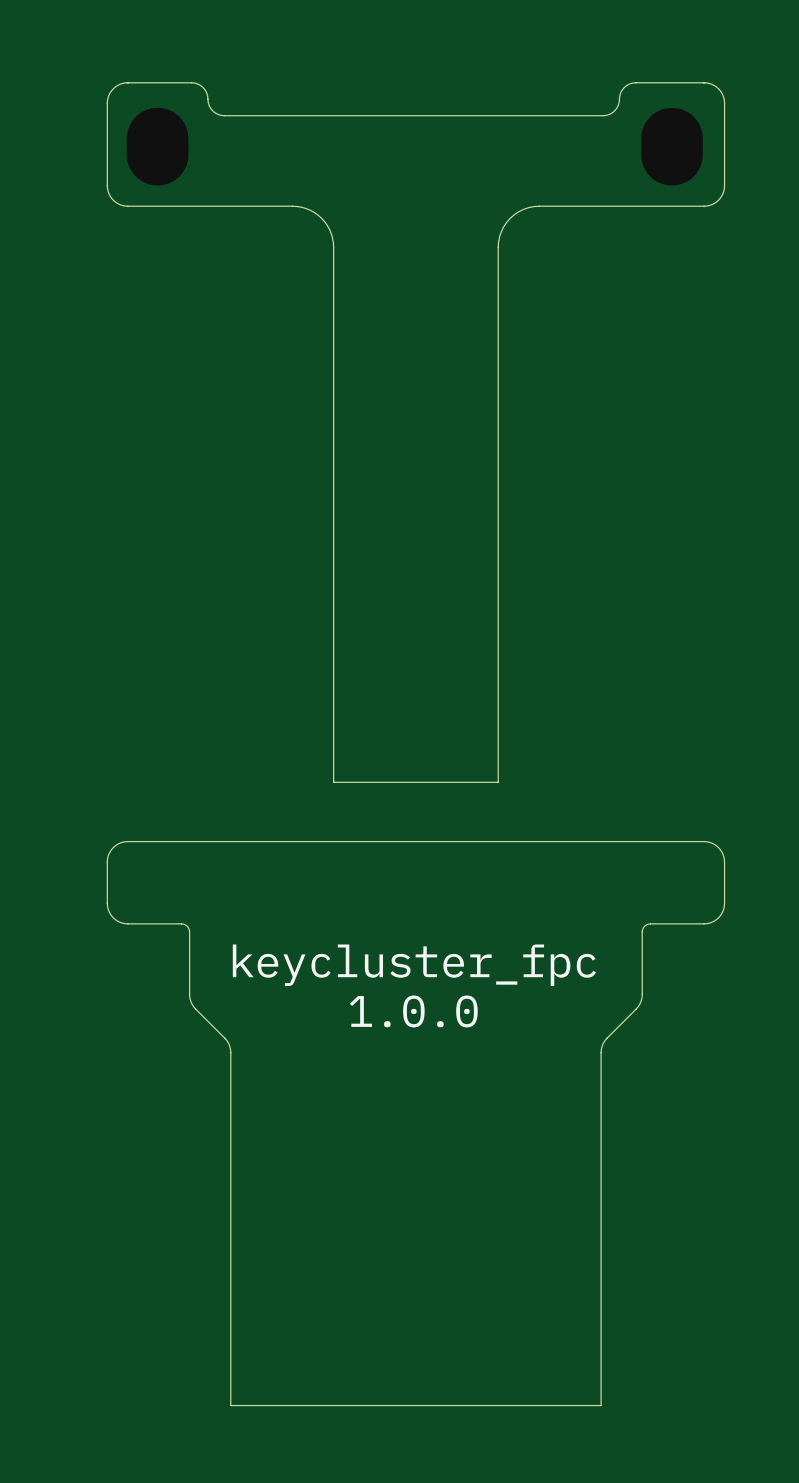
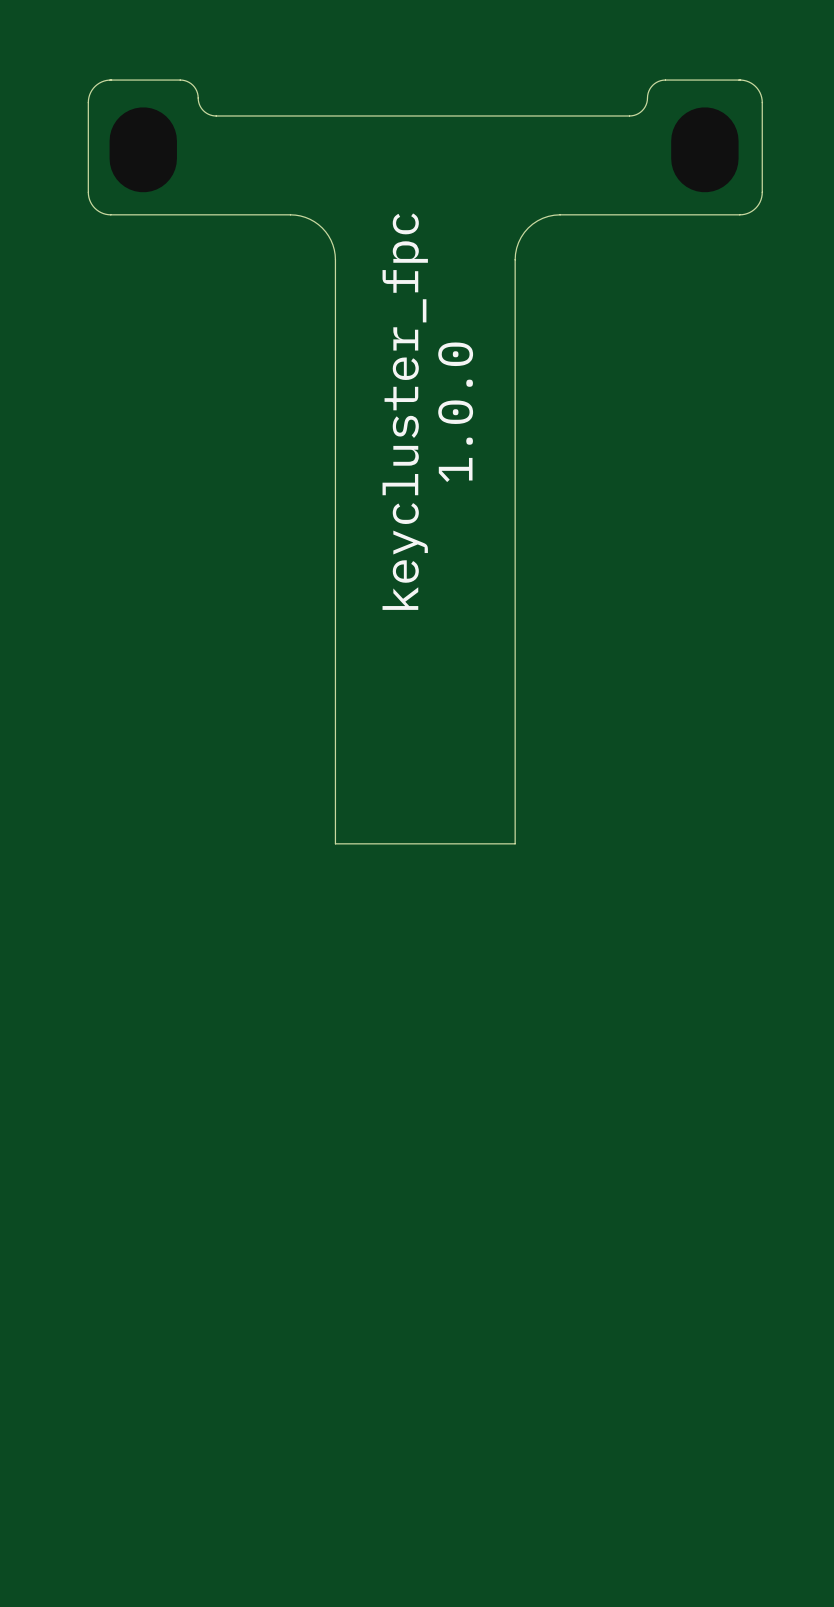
board edge: (127, 841) (703, 841) (711, 843) (720, 849) (724, 862) (724, 905) (721, 914) (714, 920) (706, 923) (650, 923) (644, 926) (642, 932) (640, 1002) (605, 1040) (601, 1047) (601, 1405) (230, 1405) (230, 1048) (226, 1039) (195, 1009) (190, 1000) (189, 932) (187, 926) (181, 923) (123, 923) (115, 919) (109, 912) (107, 903) (107, 857) (115, 846) (127, 841) -> none
text rotation: 0° (414, 965) -> 90° counterclockwise (405, 411)
text position: keycluster_fpc (414, 965) -> keycluster_fpc (405, 411)
text rotation: 0° (413, 1011) -> 90° counterclockwise (455, 412)
text position: 1.0.0 (413, 1011) -> 1.0.0 (455, 412)

